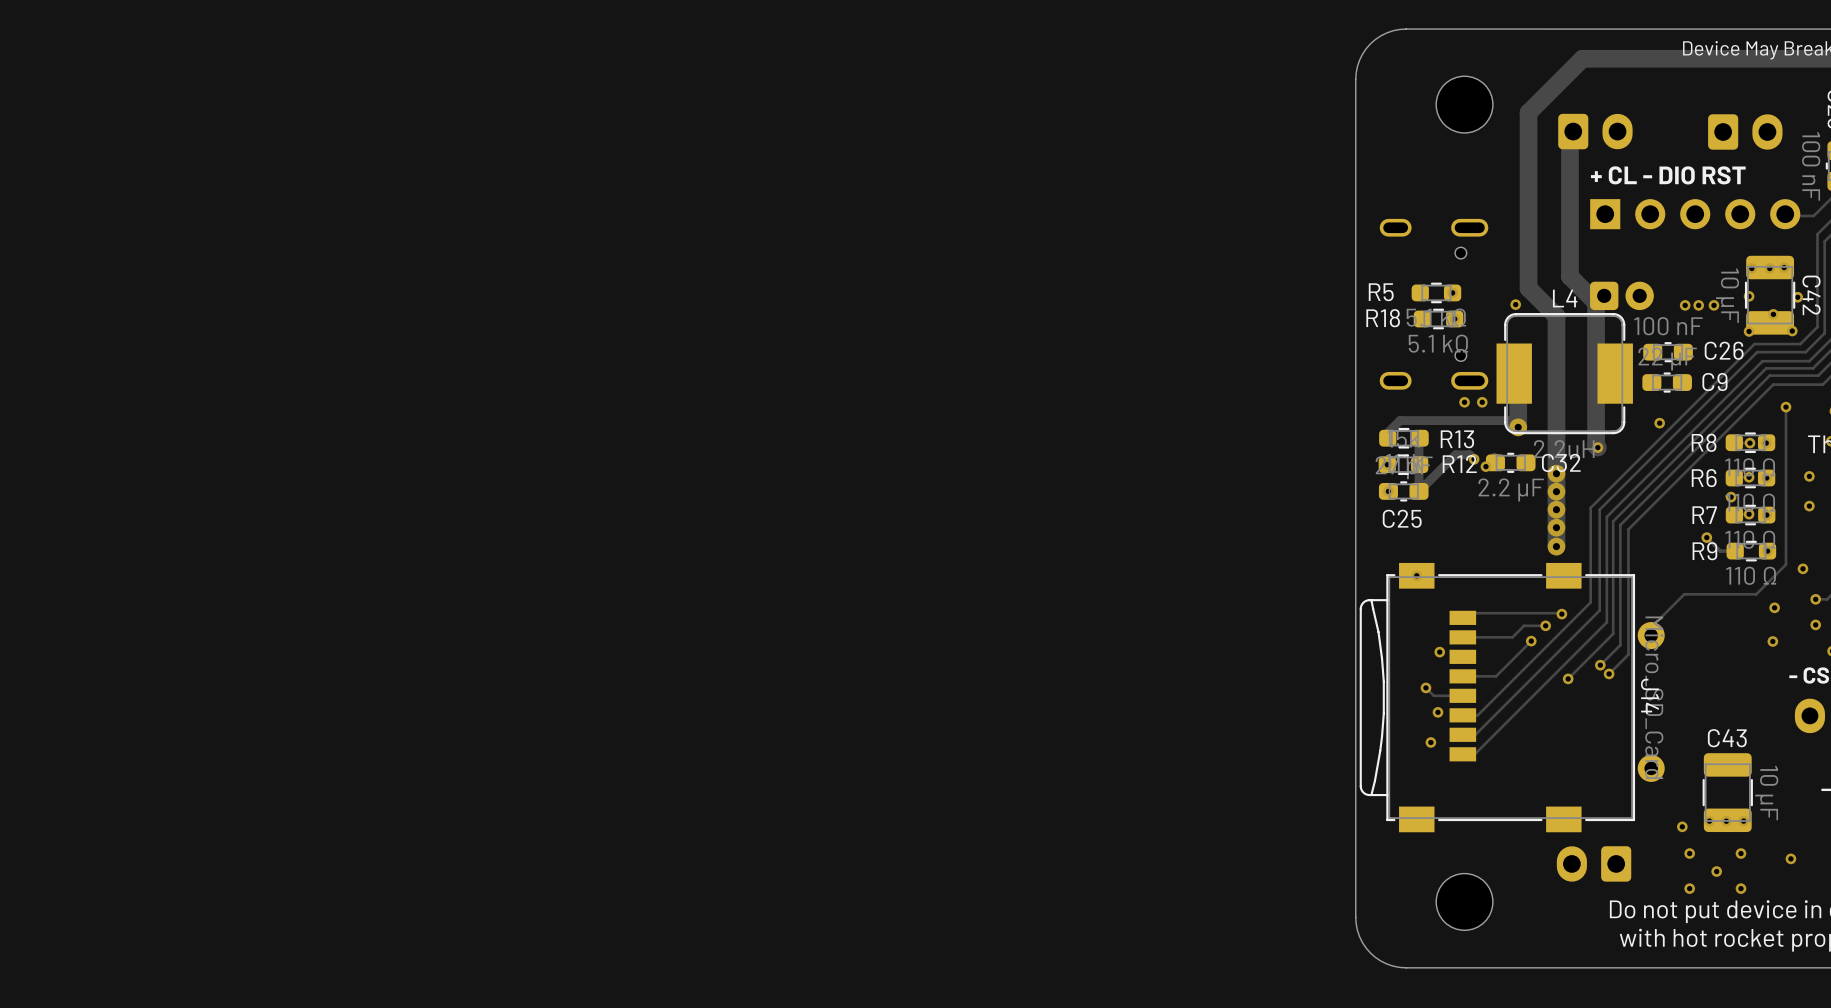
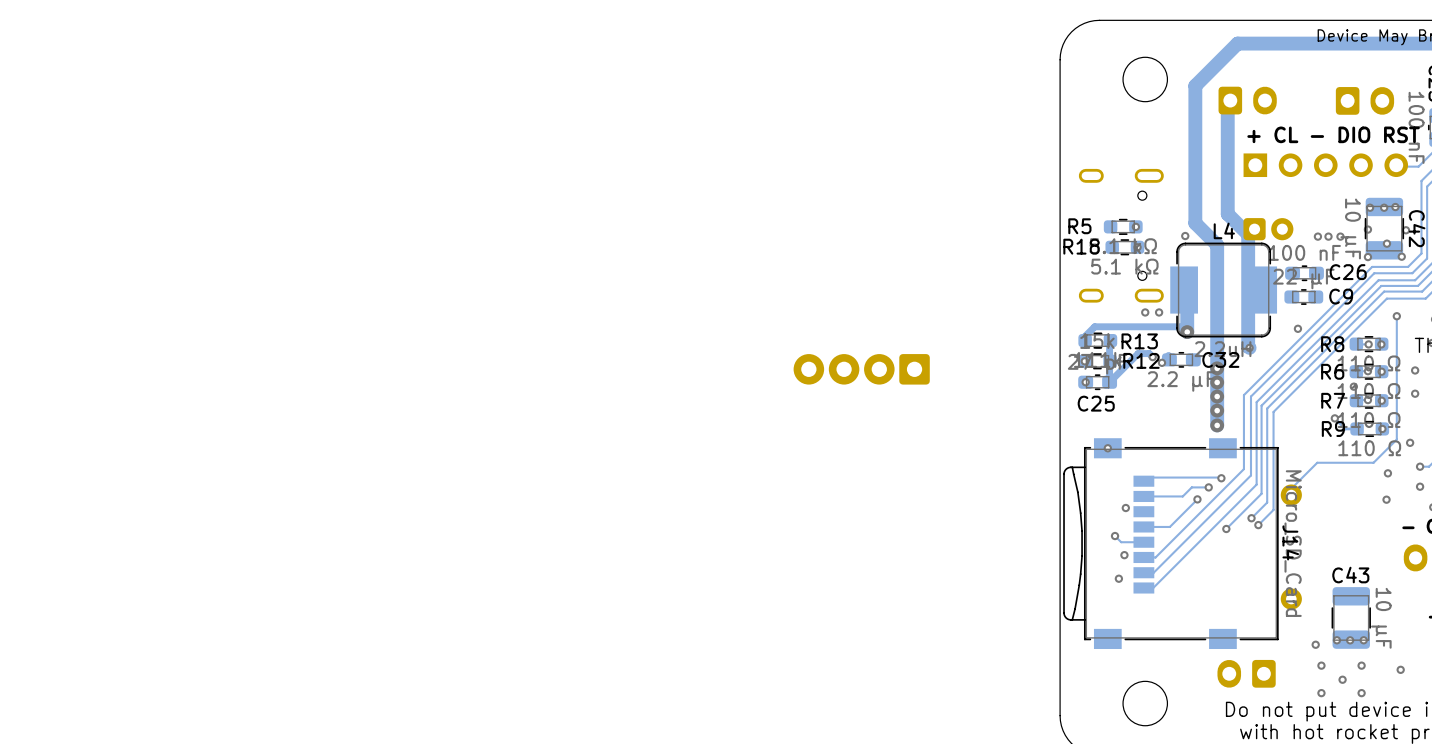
part: none -> (861, 369)

